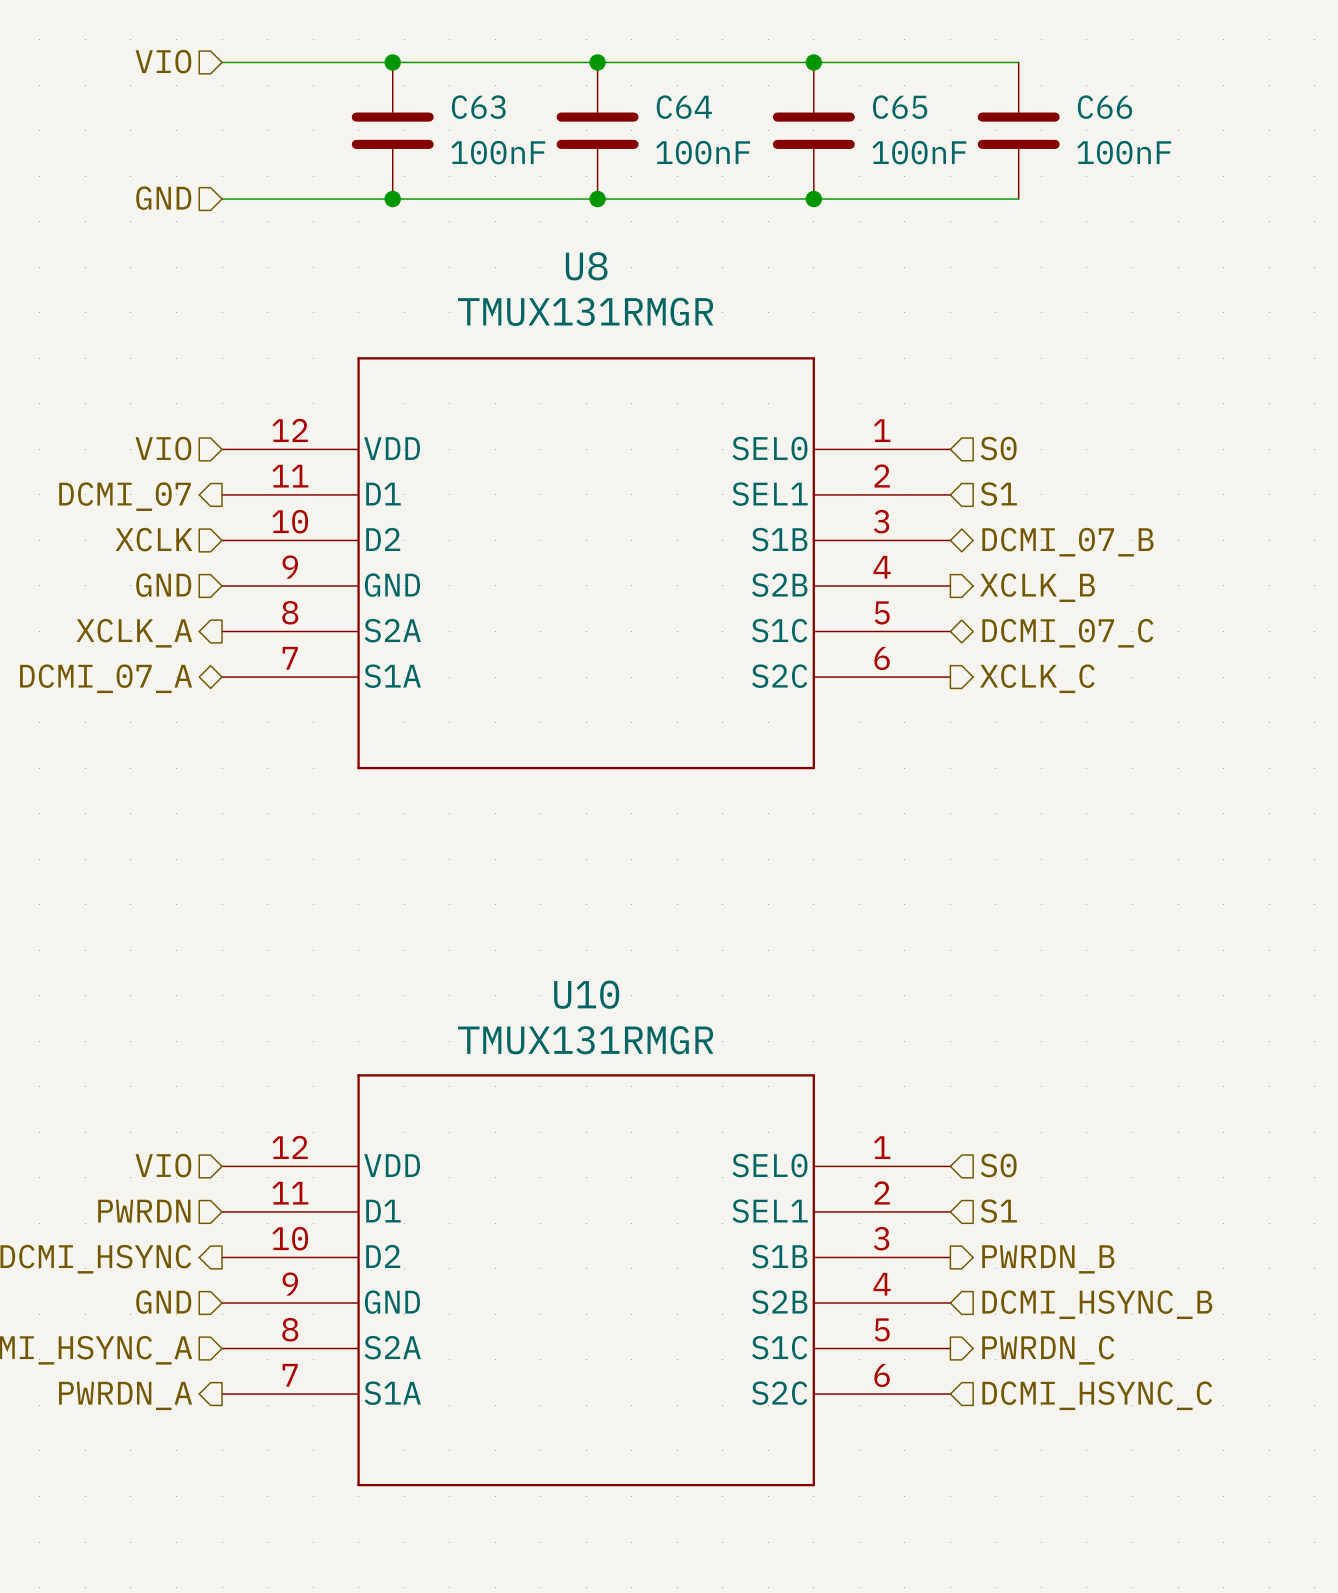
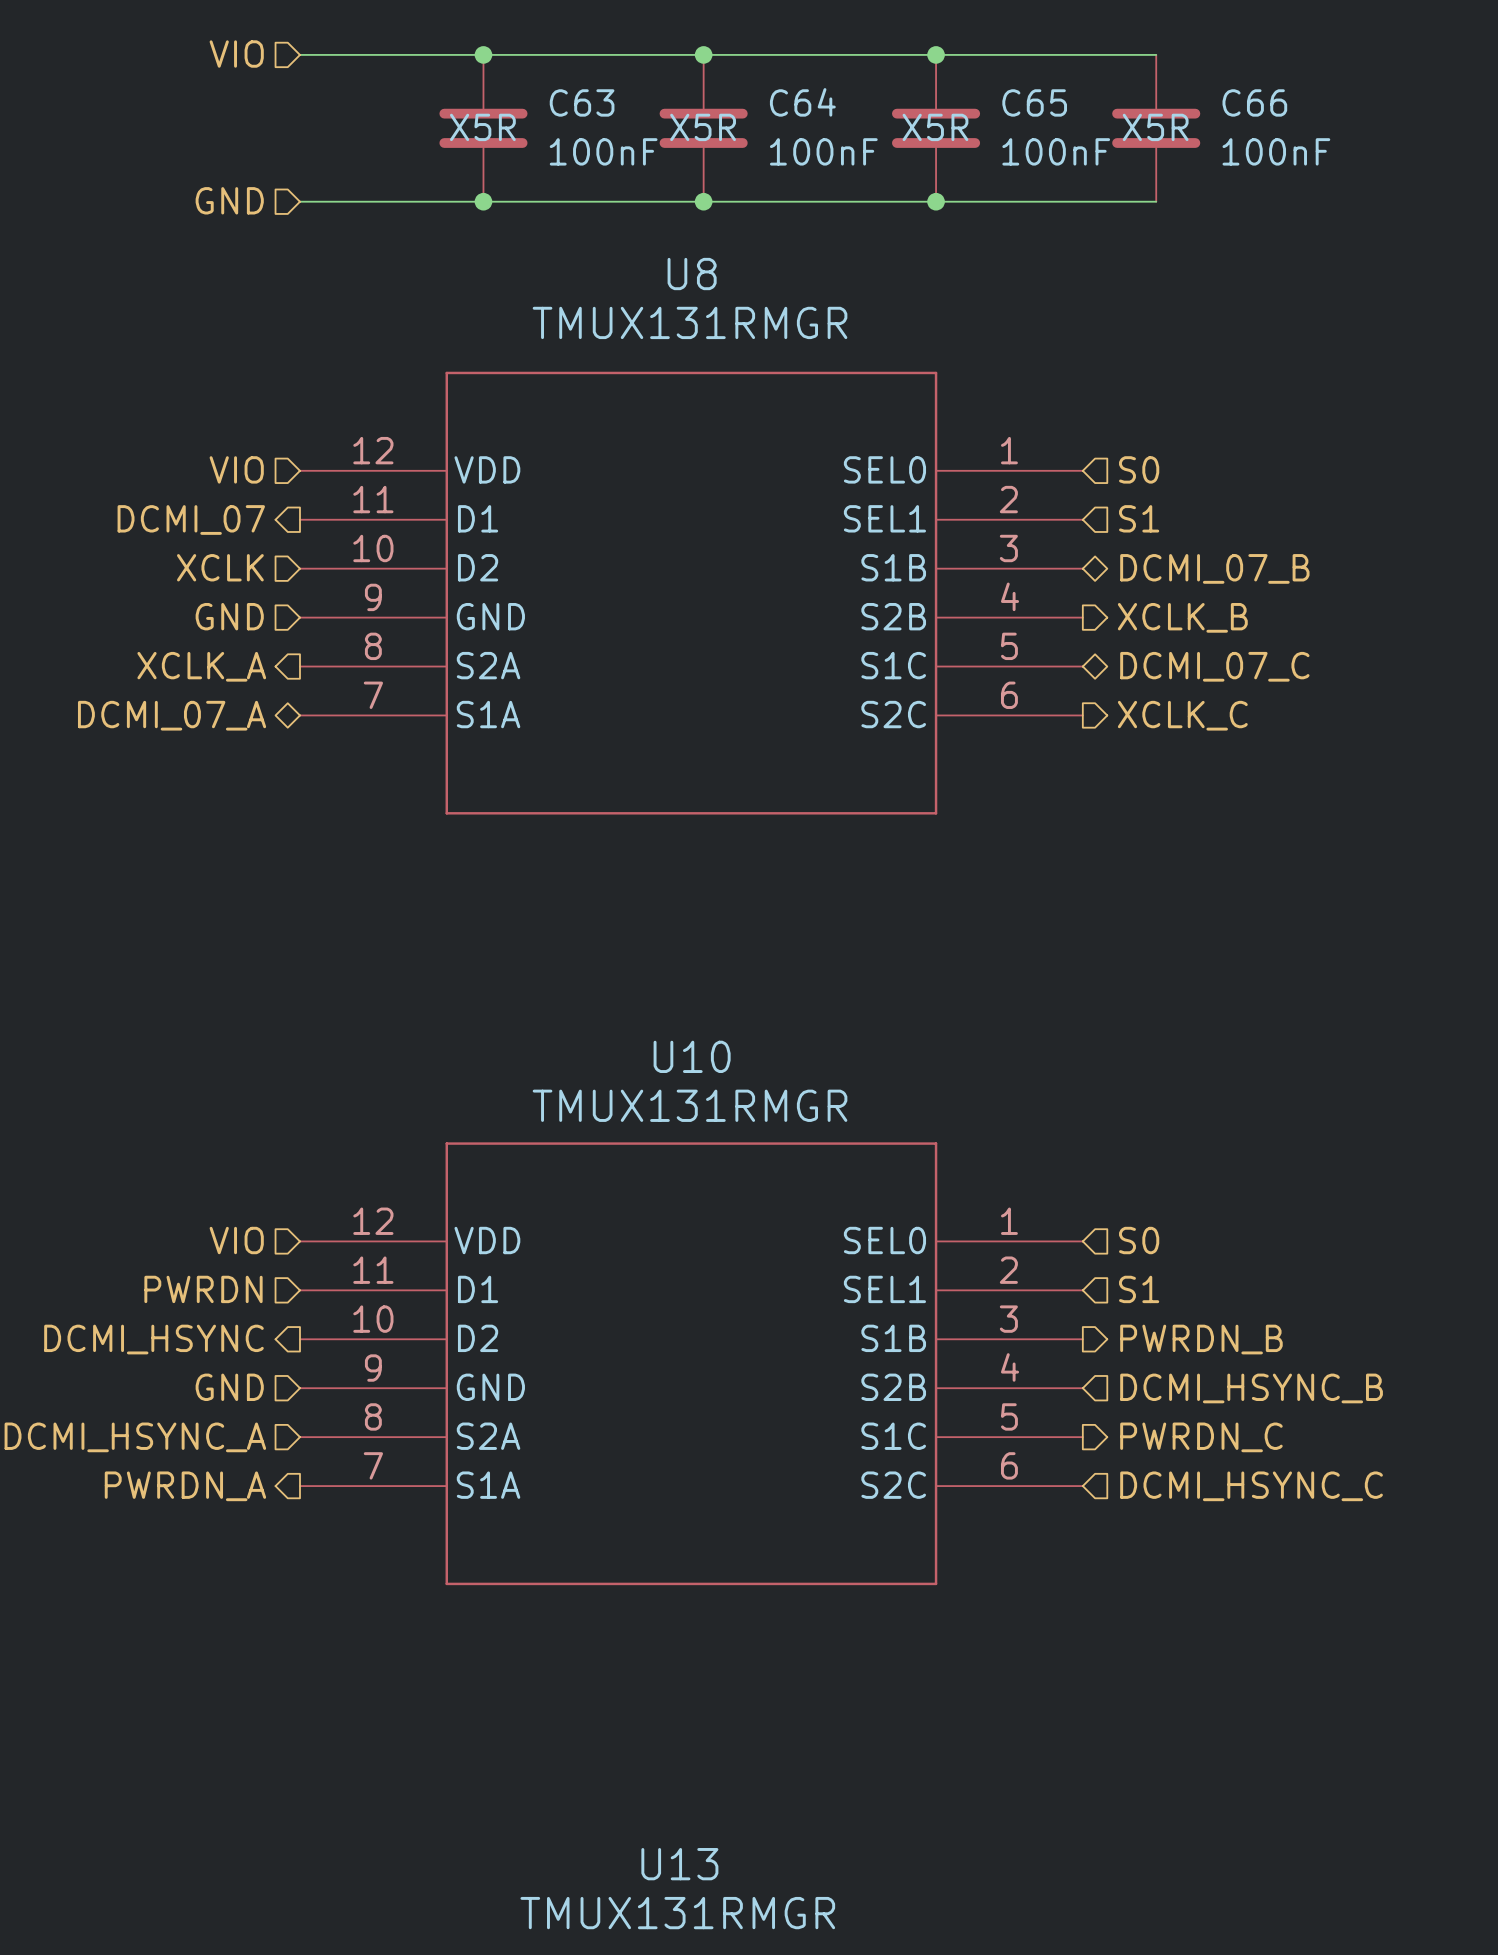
C63 text: none -> X5R (482, 127)
C64 text: none -> X5R (703, 127)
C65 text: none -> X5R (935, 127)
C66 text: none -> X5R (1155, 127)

